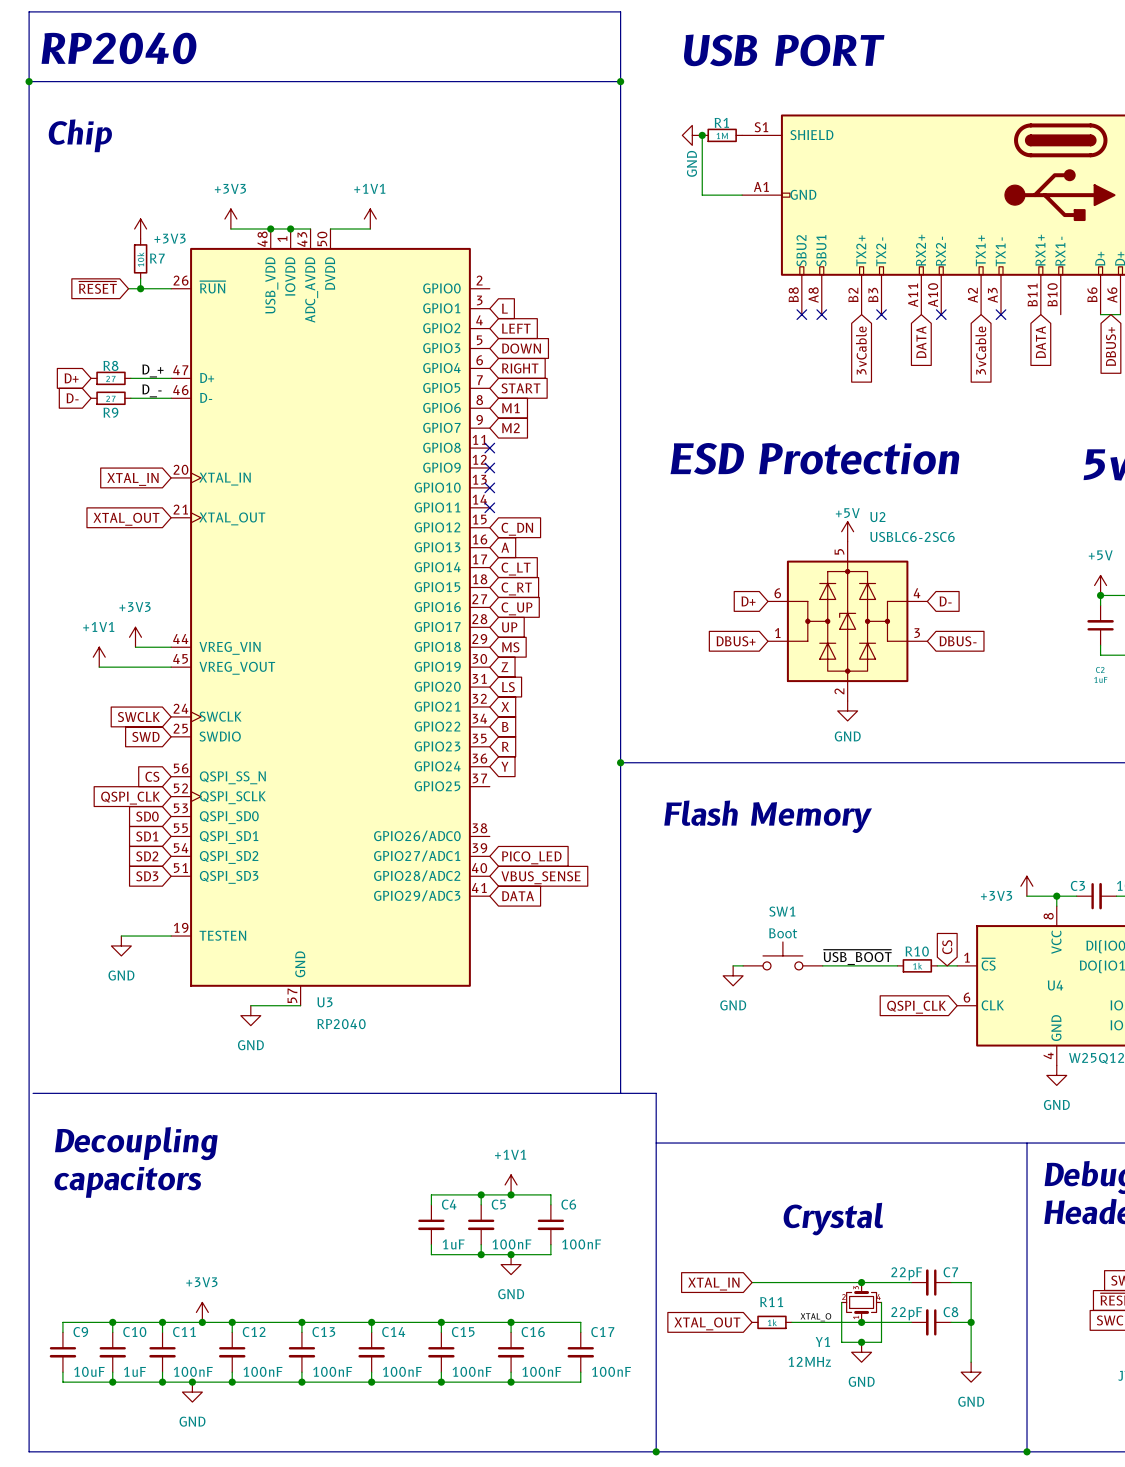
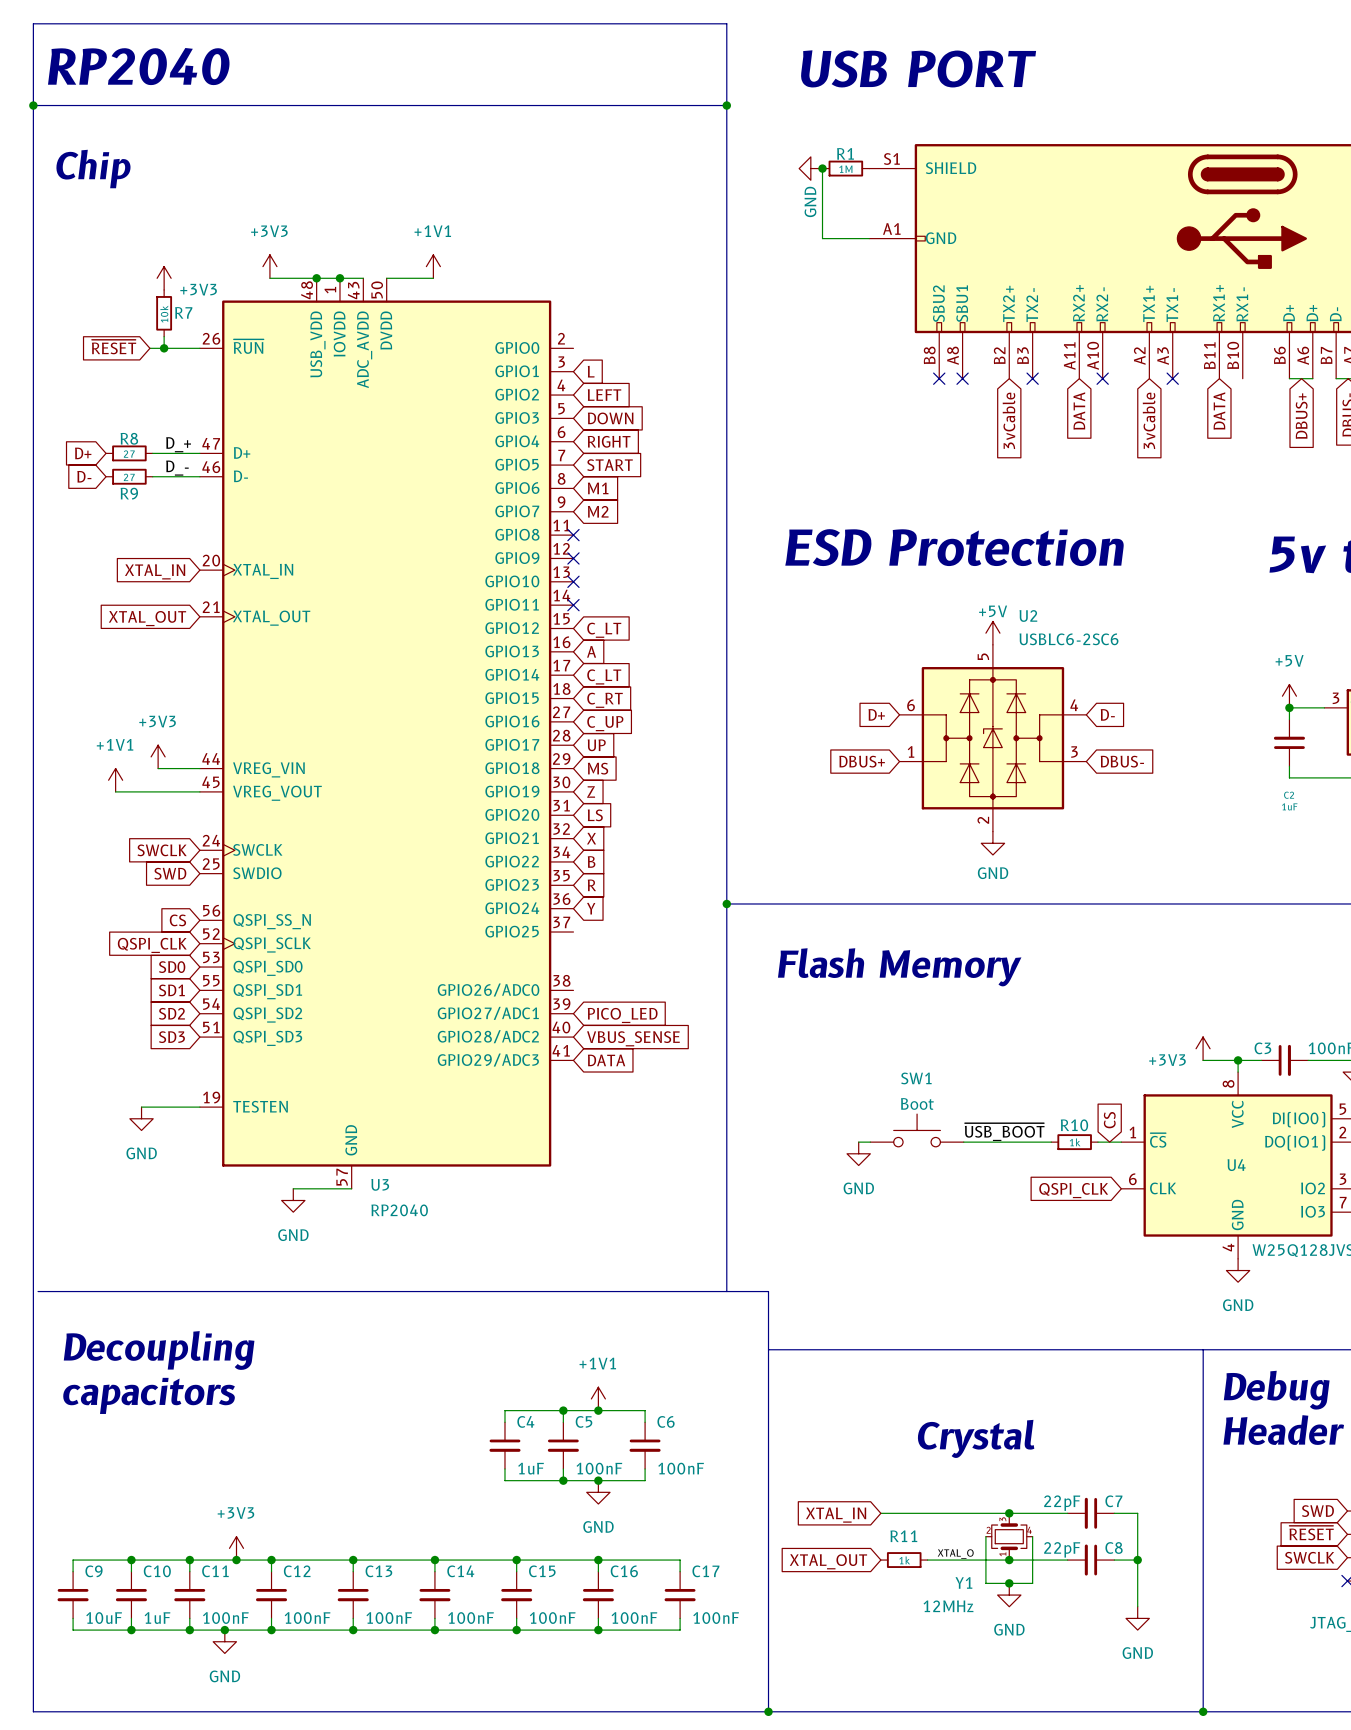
global label: C_DN (517, 529) -> C_LT (604, 630)

